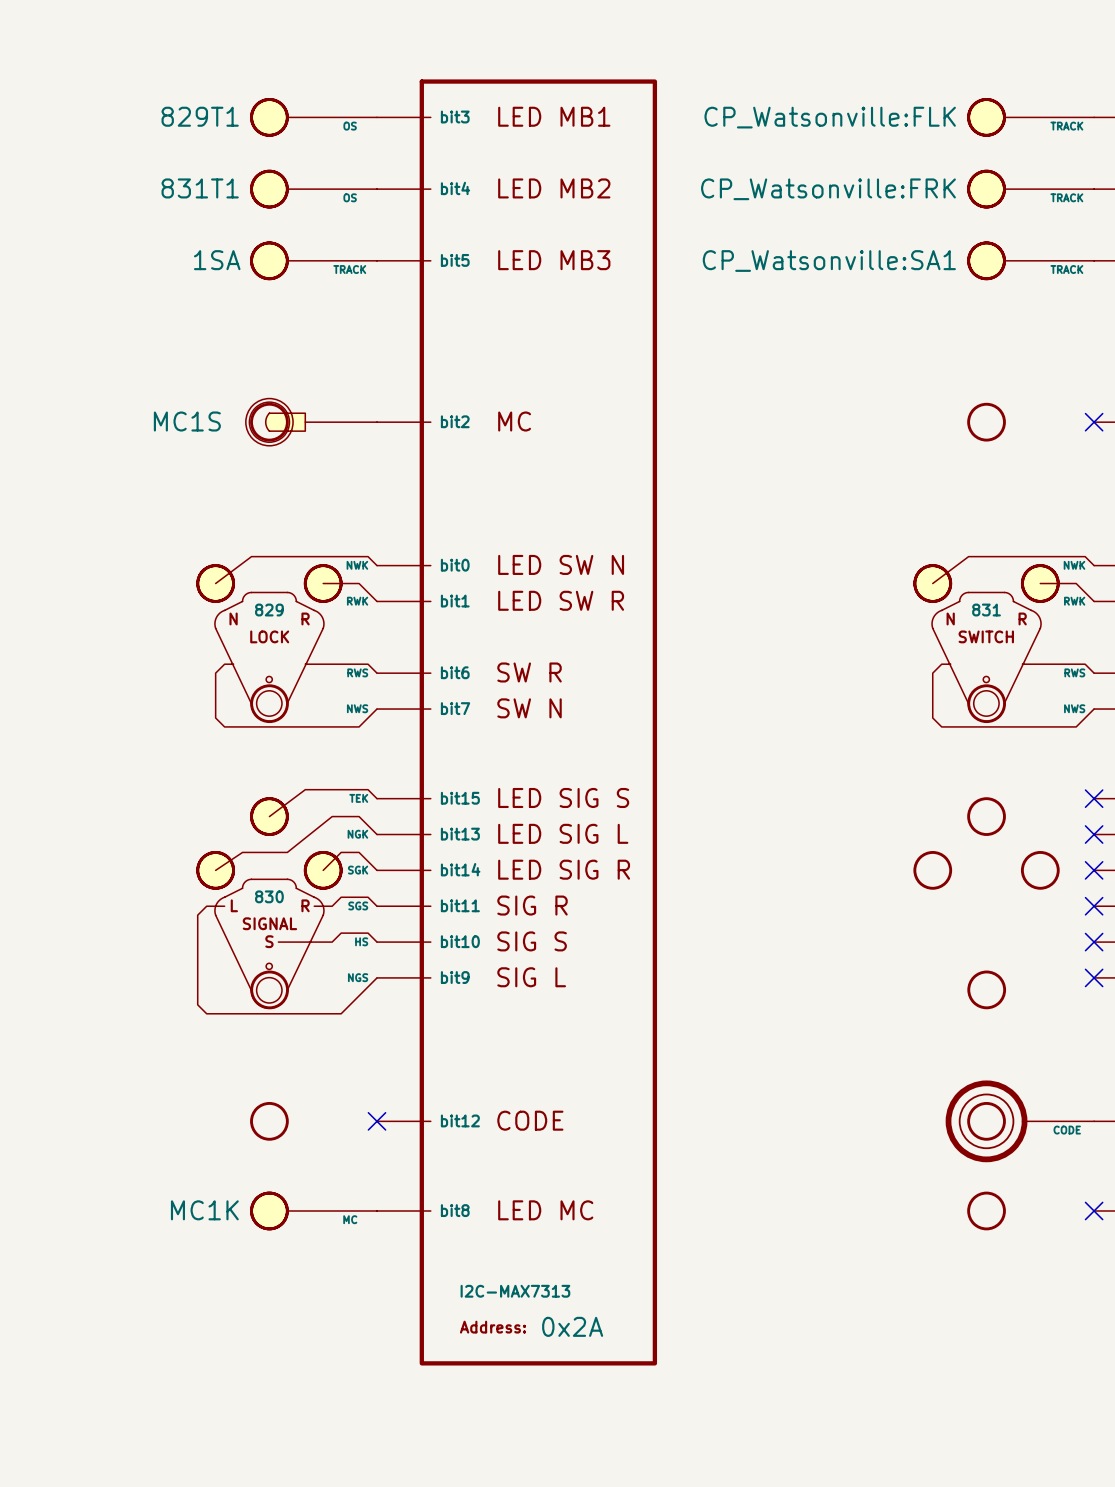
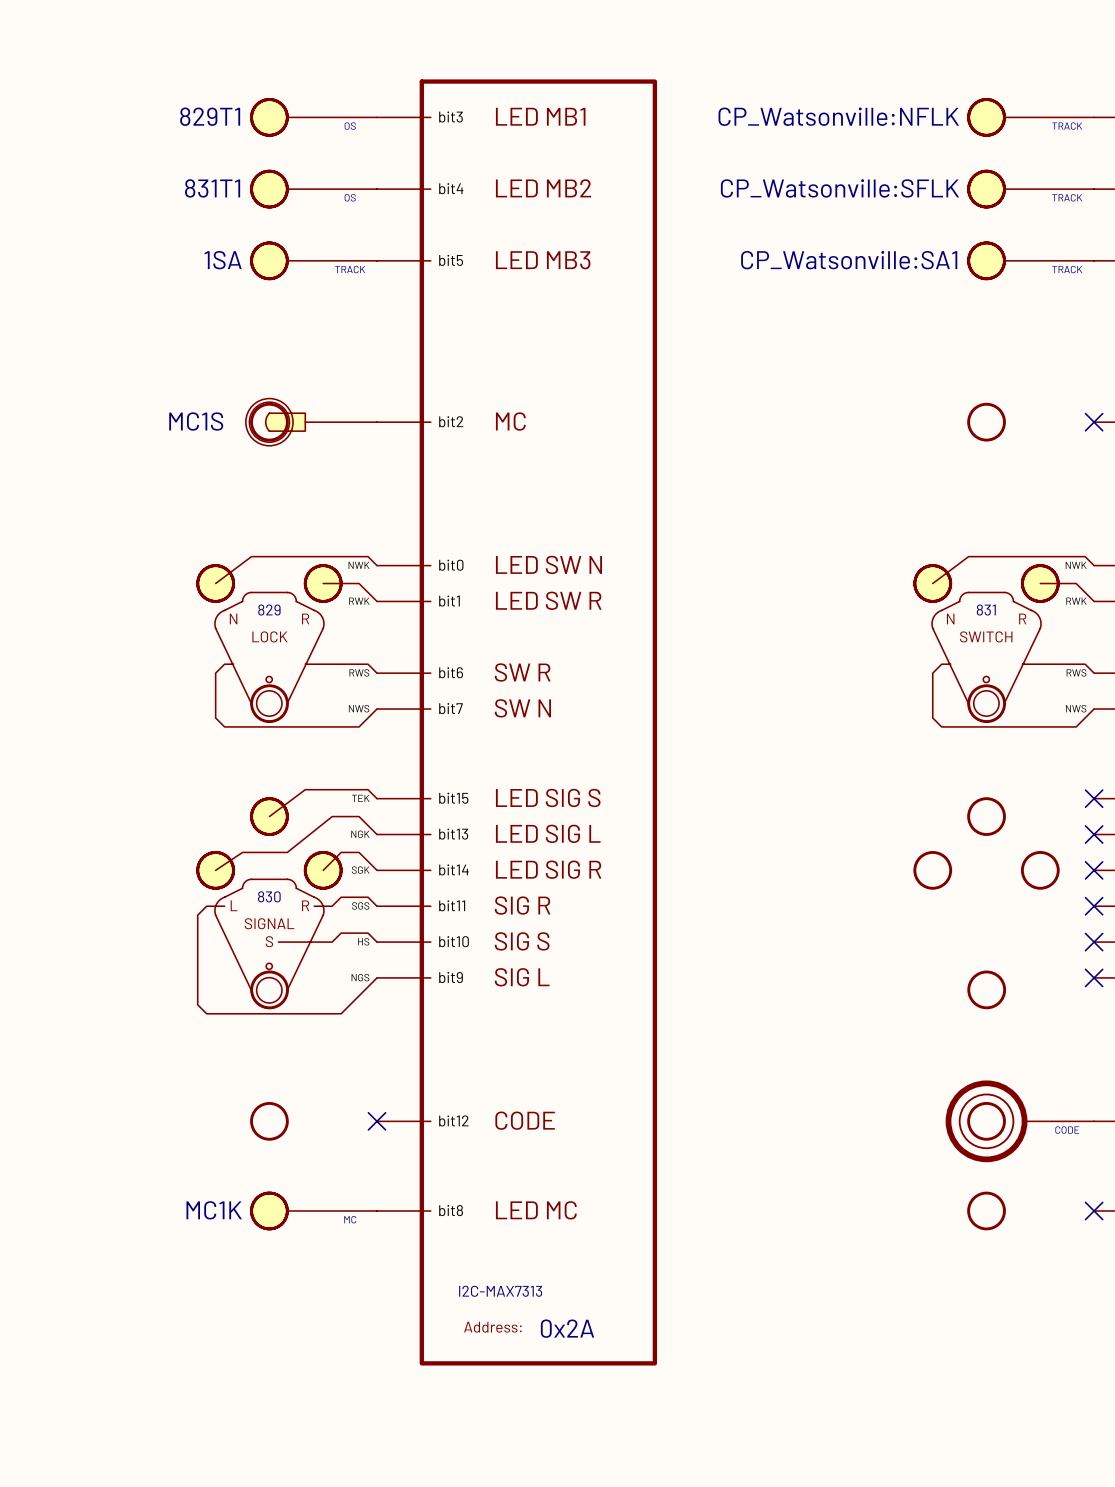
part text: CP_Watsonville:FLK (830, 117) -> CP_Watsonville:NFLK (838, 116)
part text: CP_Watsonville:FRK (828, 189) -> CP_Watsonville:SFLK (839, 188)
part value: 0x2A (572, 1326) -> none
part text: none -> 0x2A (567, 1328)

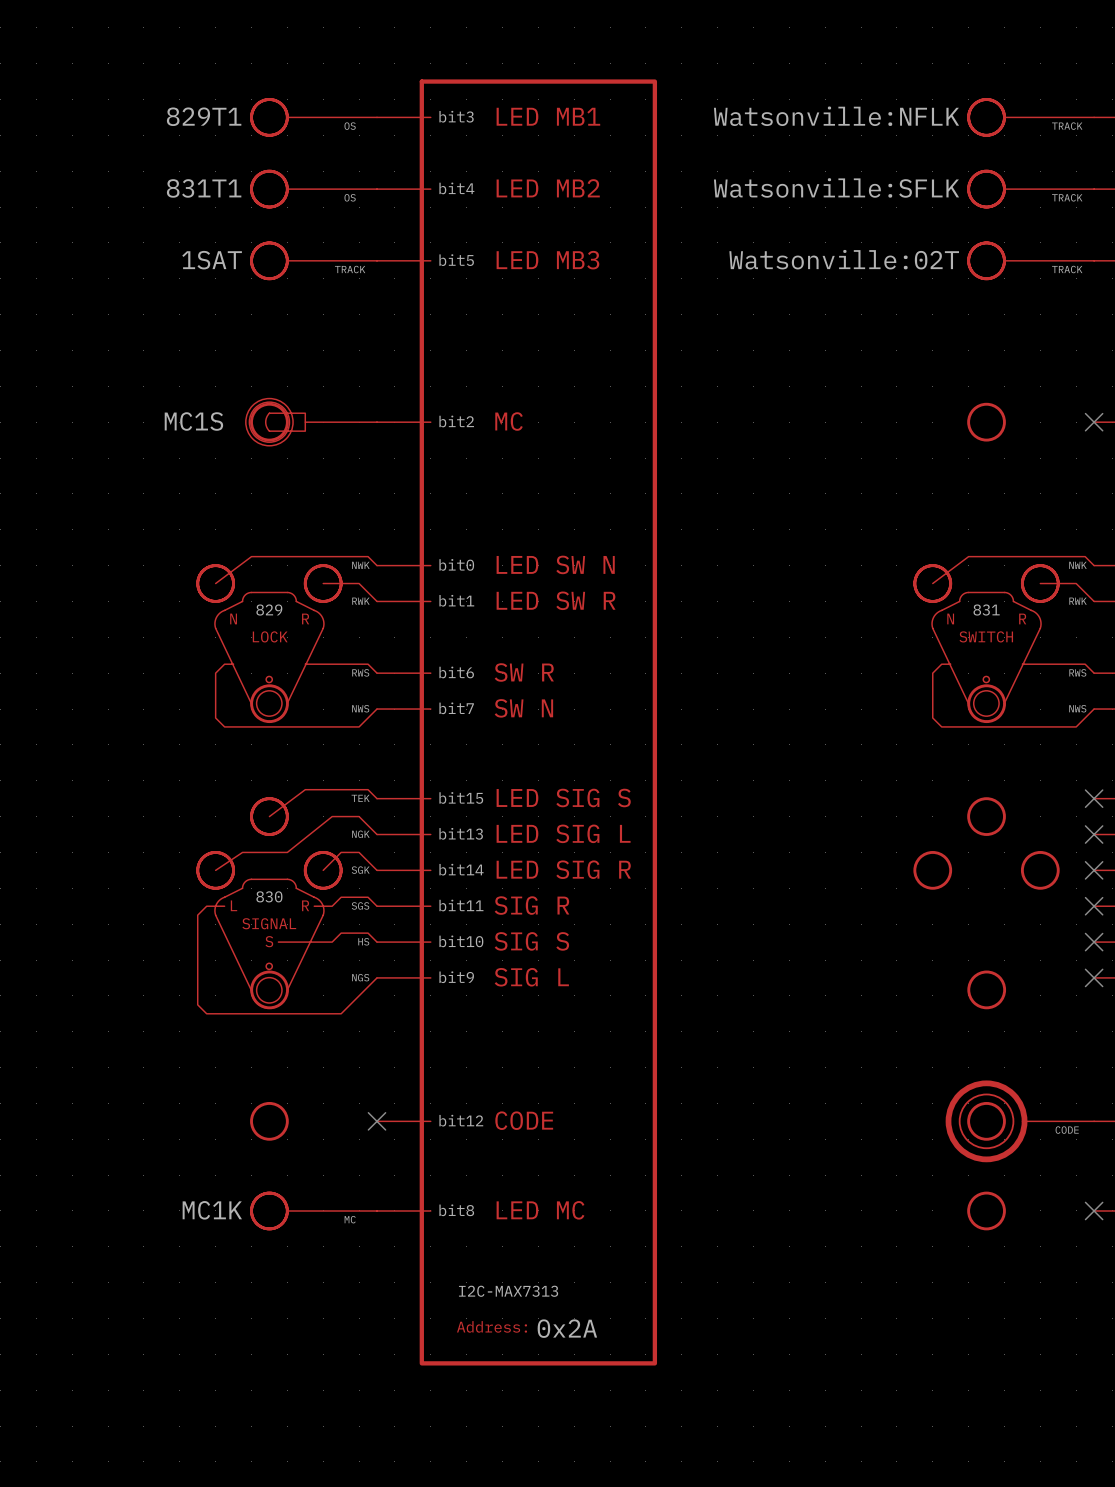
part text: CP_Watsonville:NFLK (838, 116) -> Watsonville:NFLK (836, 116)
part text: CP_Watsonville:SFLK (839, 188) -> Watsonville:SFLK (836, 187)
part text: 1SA (223, 260) -> 1SAT (212, 260)
part text: CP_Watsonville:SA1 (849, 260) -> Watsonville:02T (844, 259)

